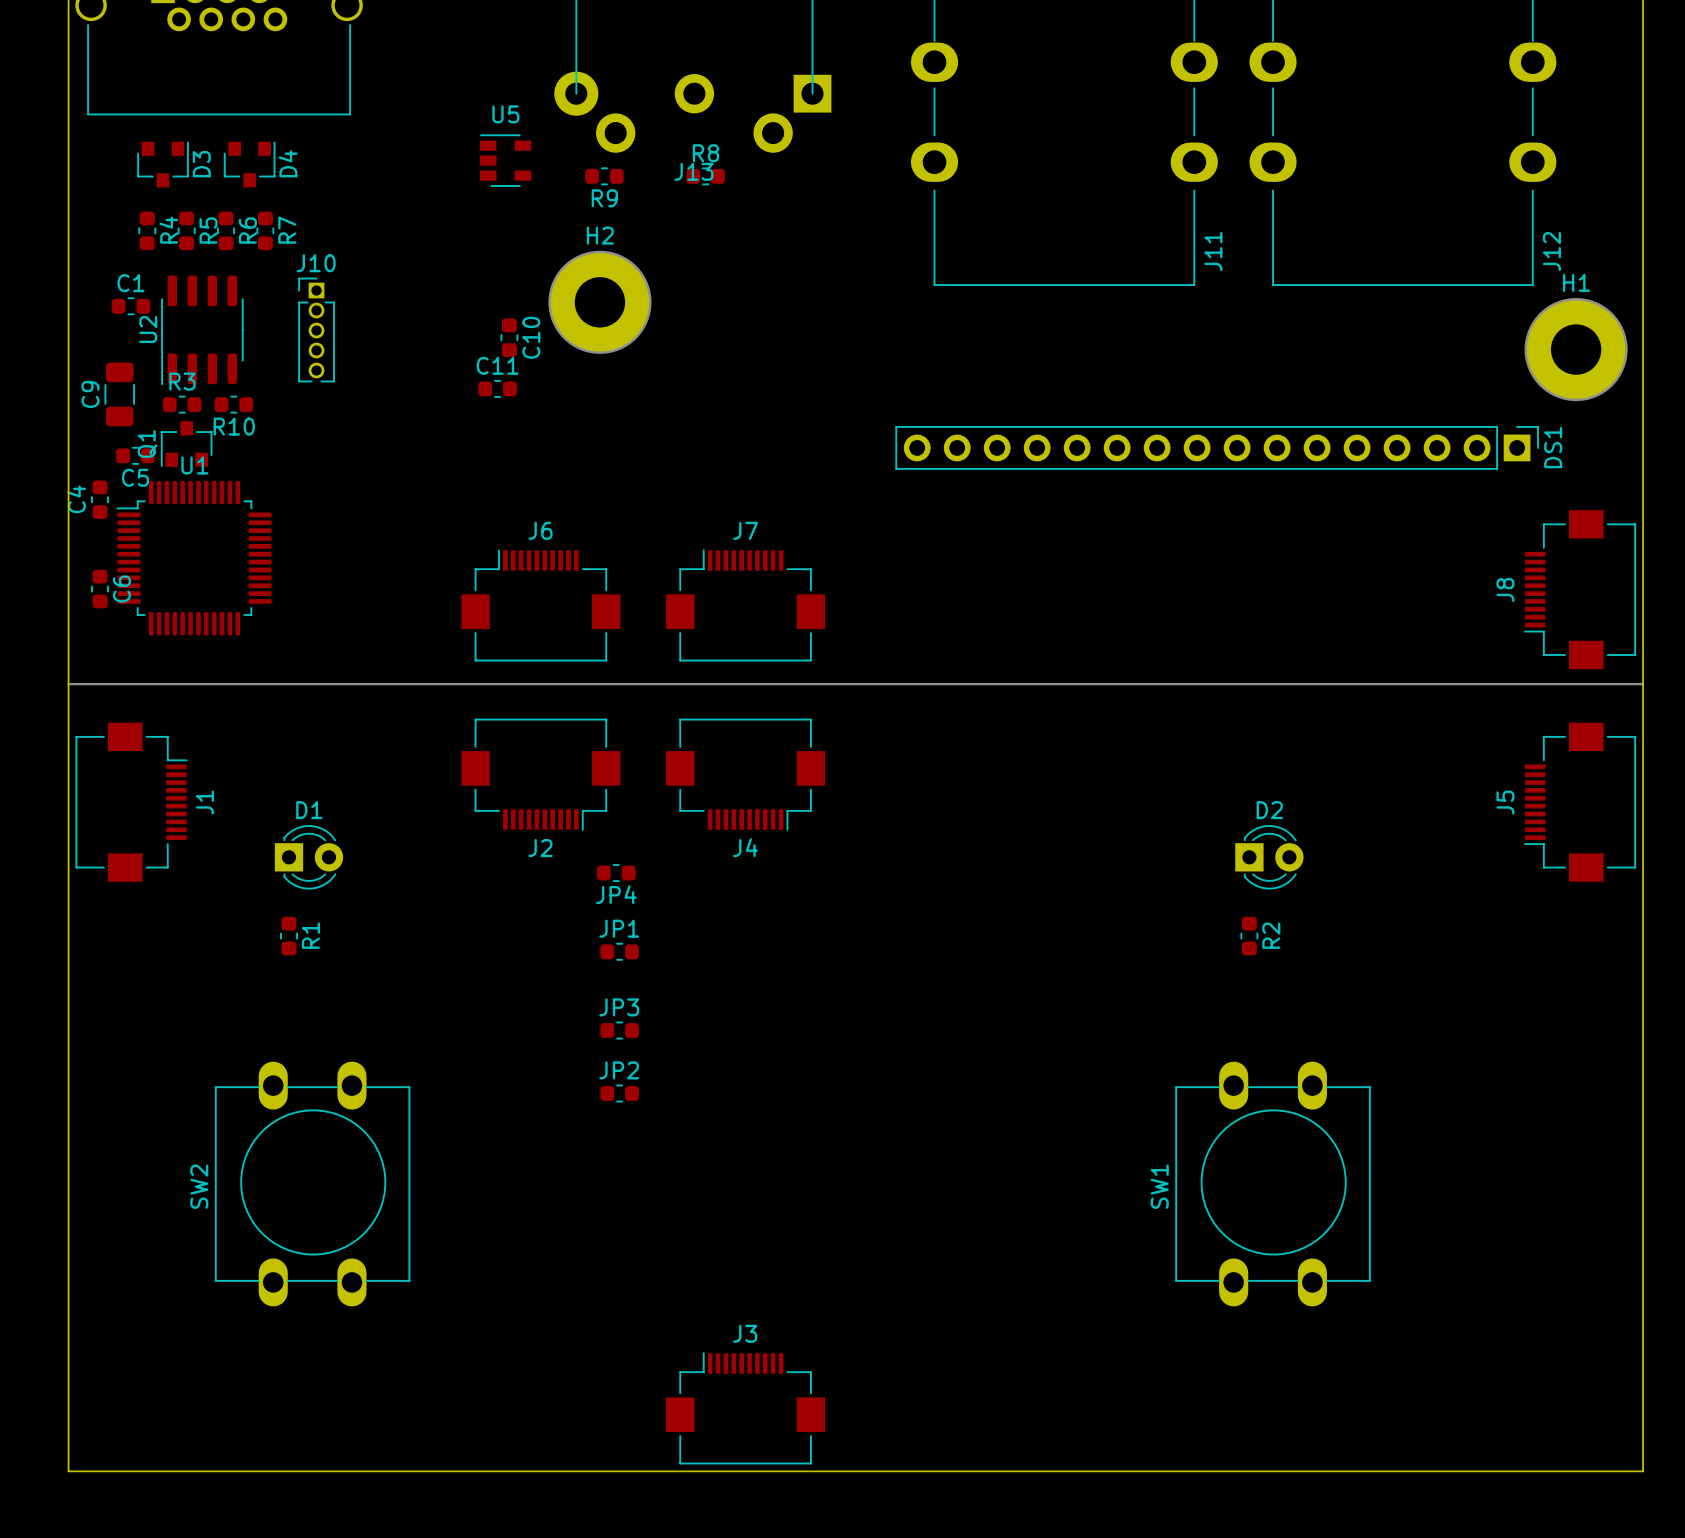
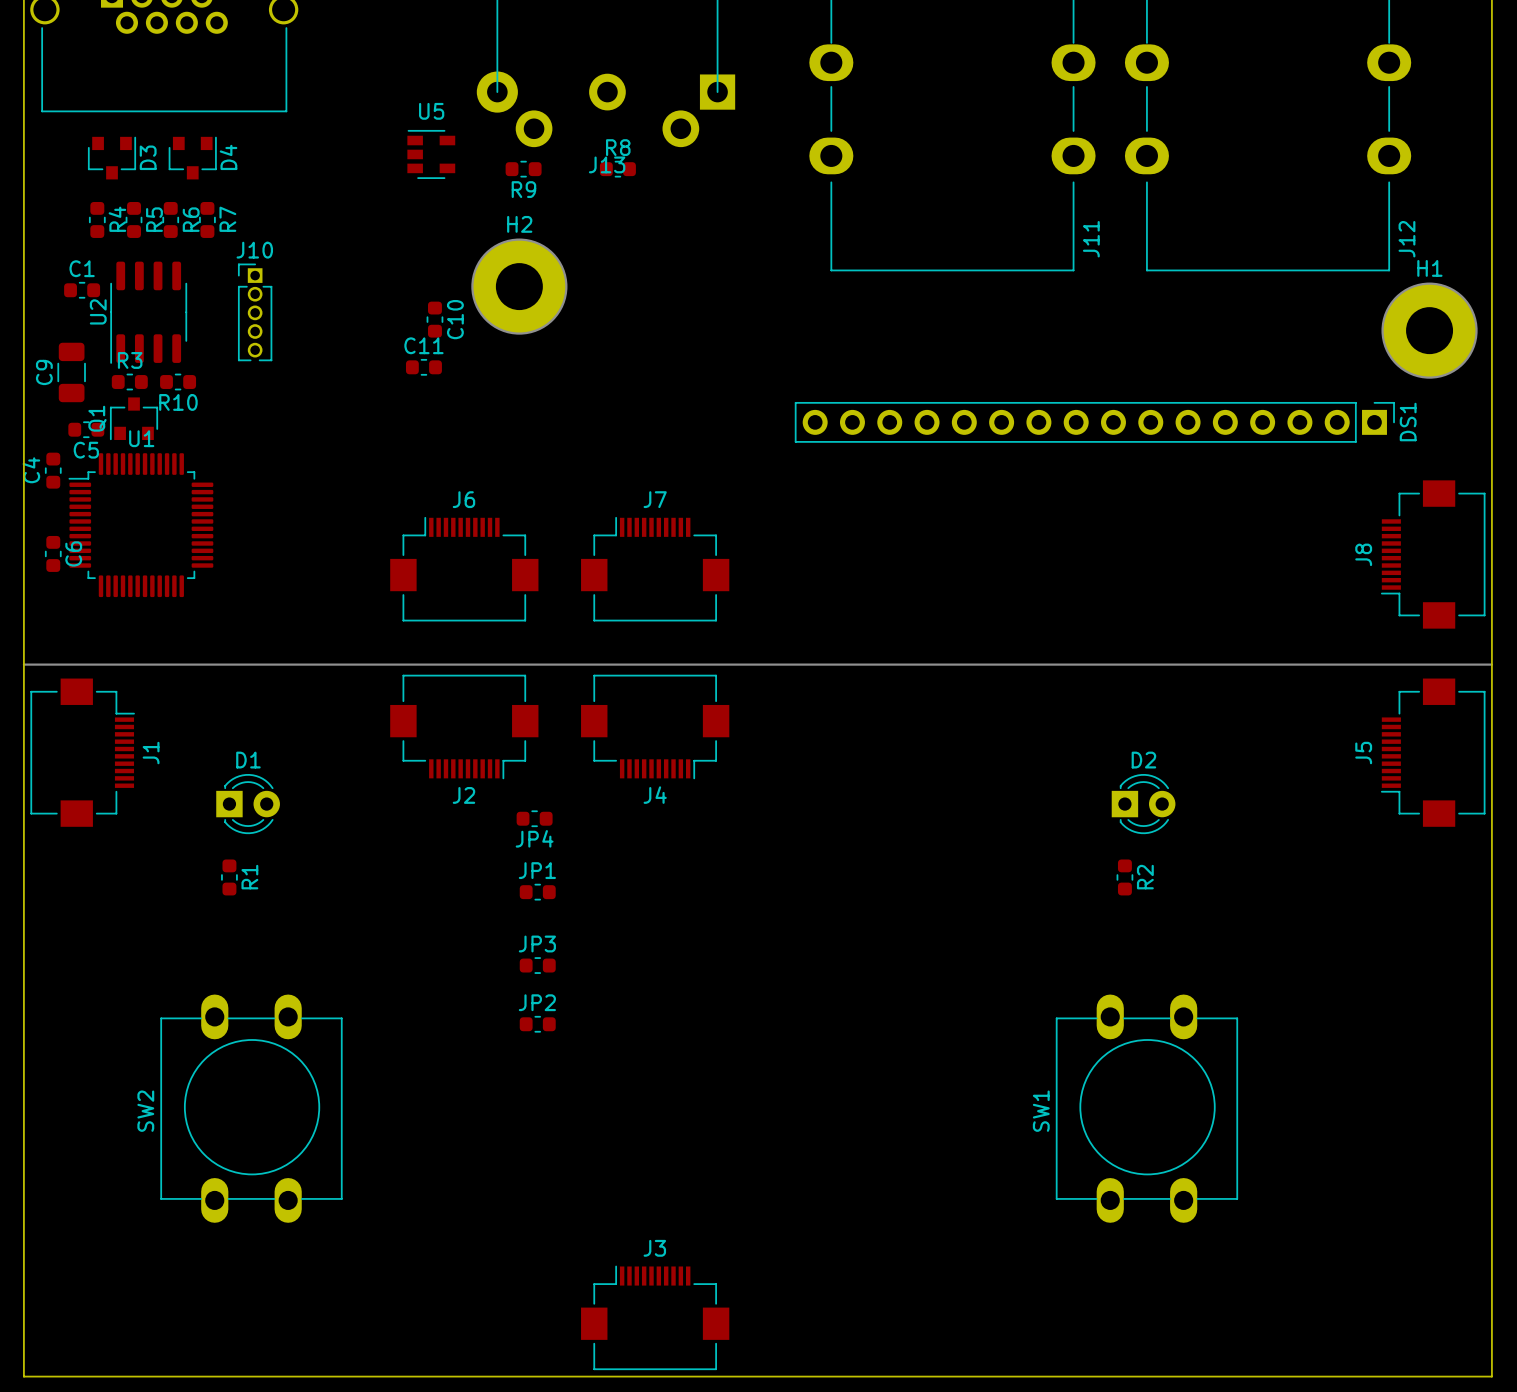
line: (68, 684) (1643, 684) -> (23, 664) (1491, 664)

